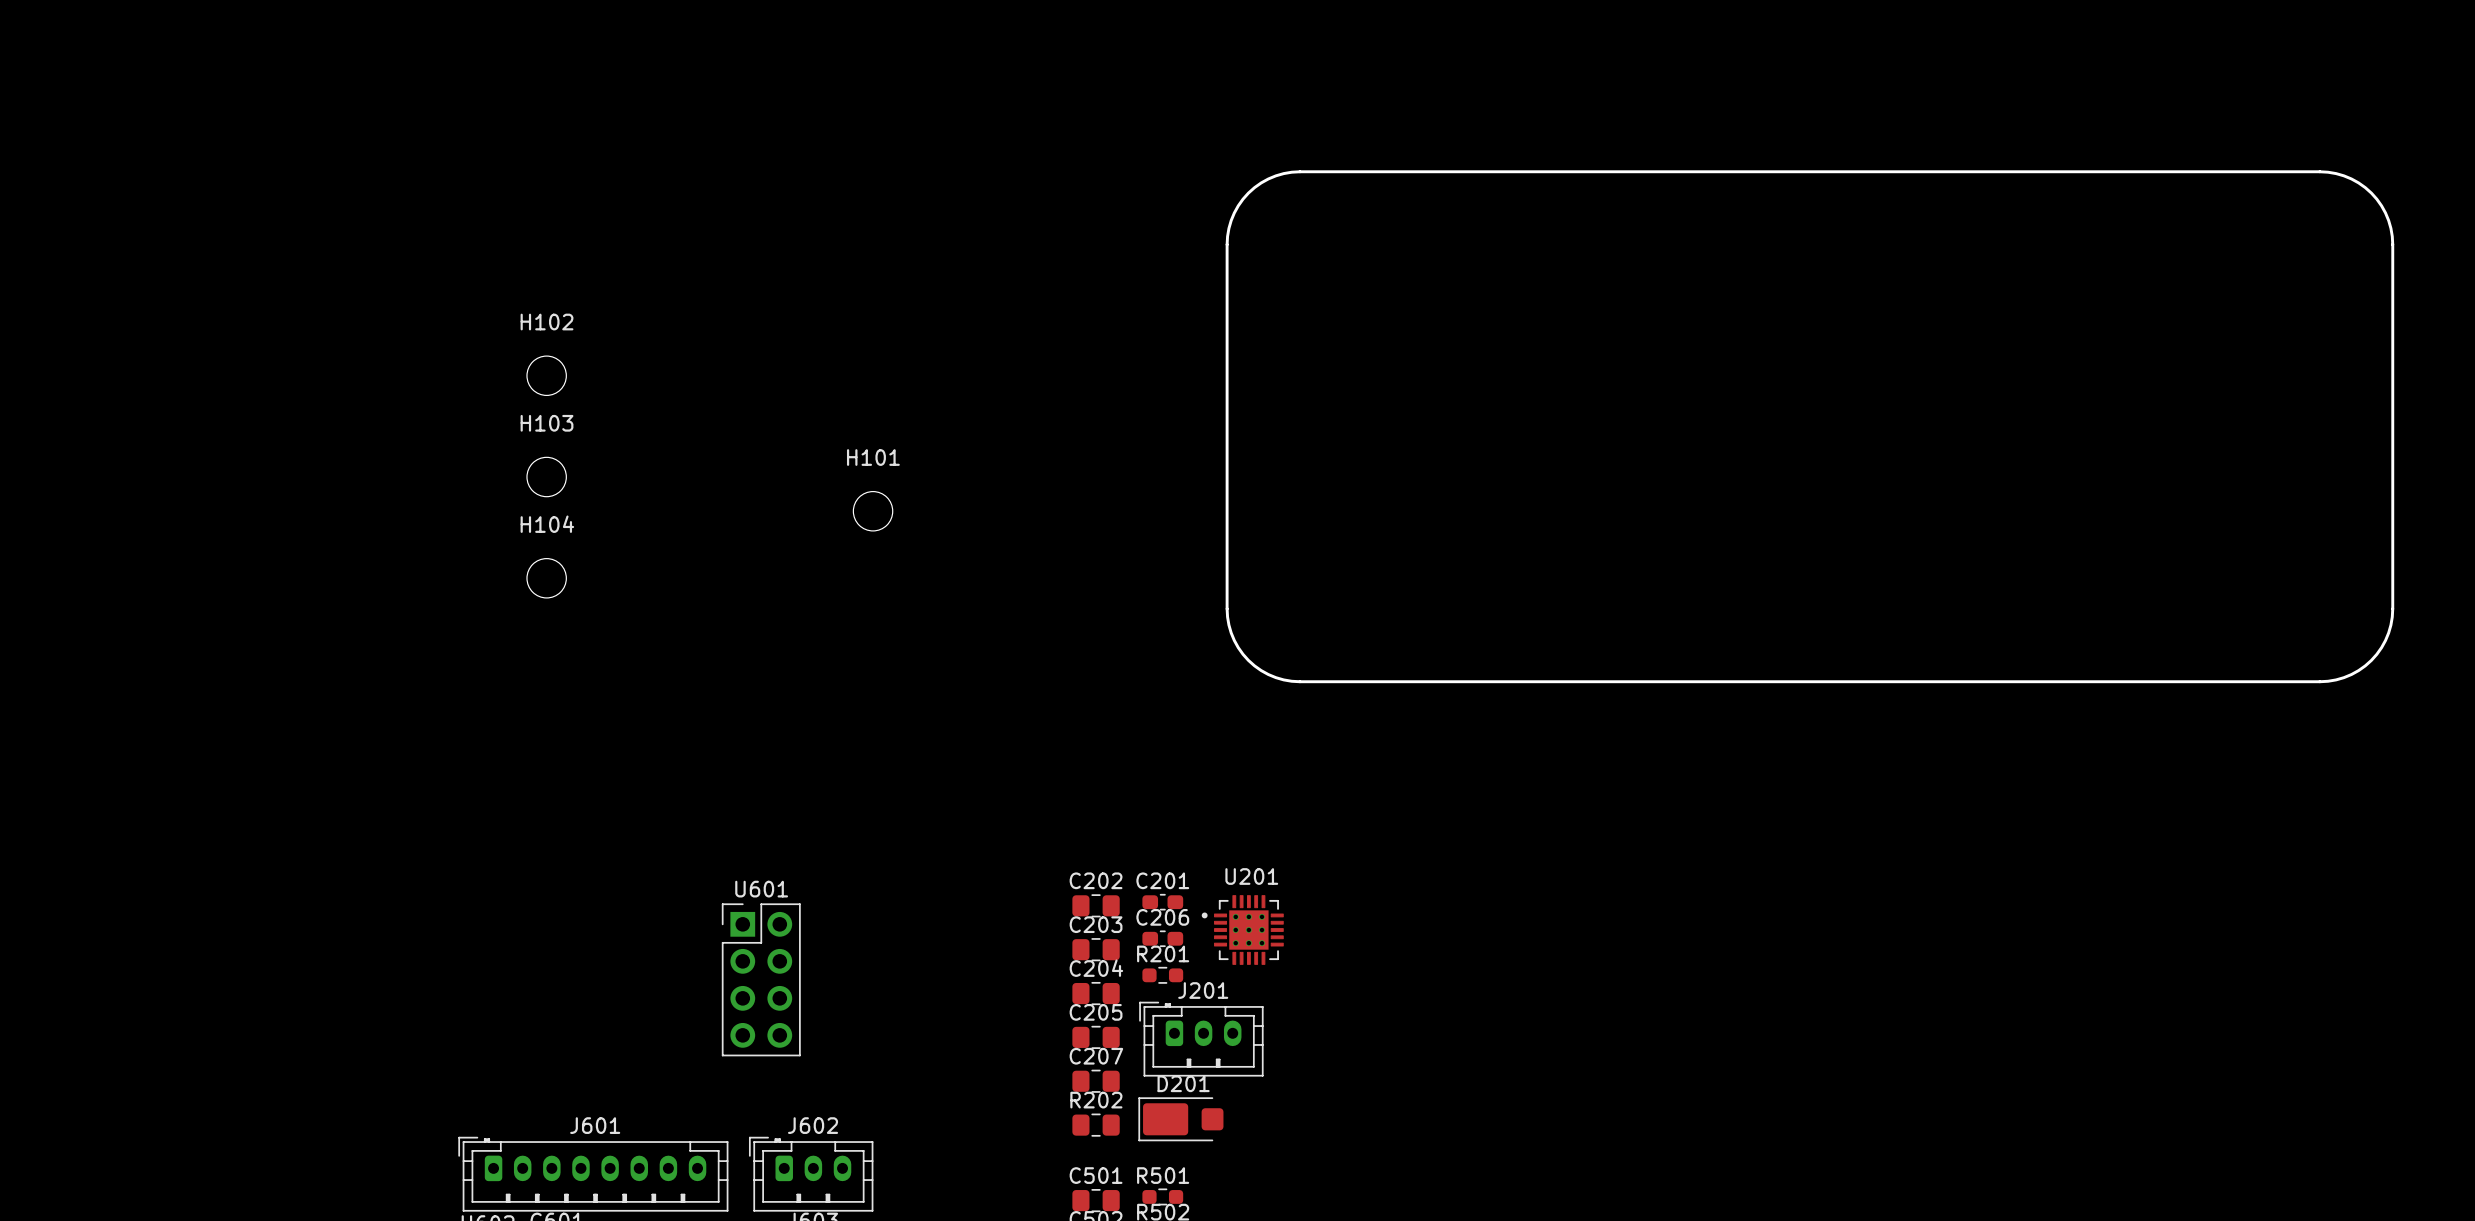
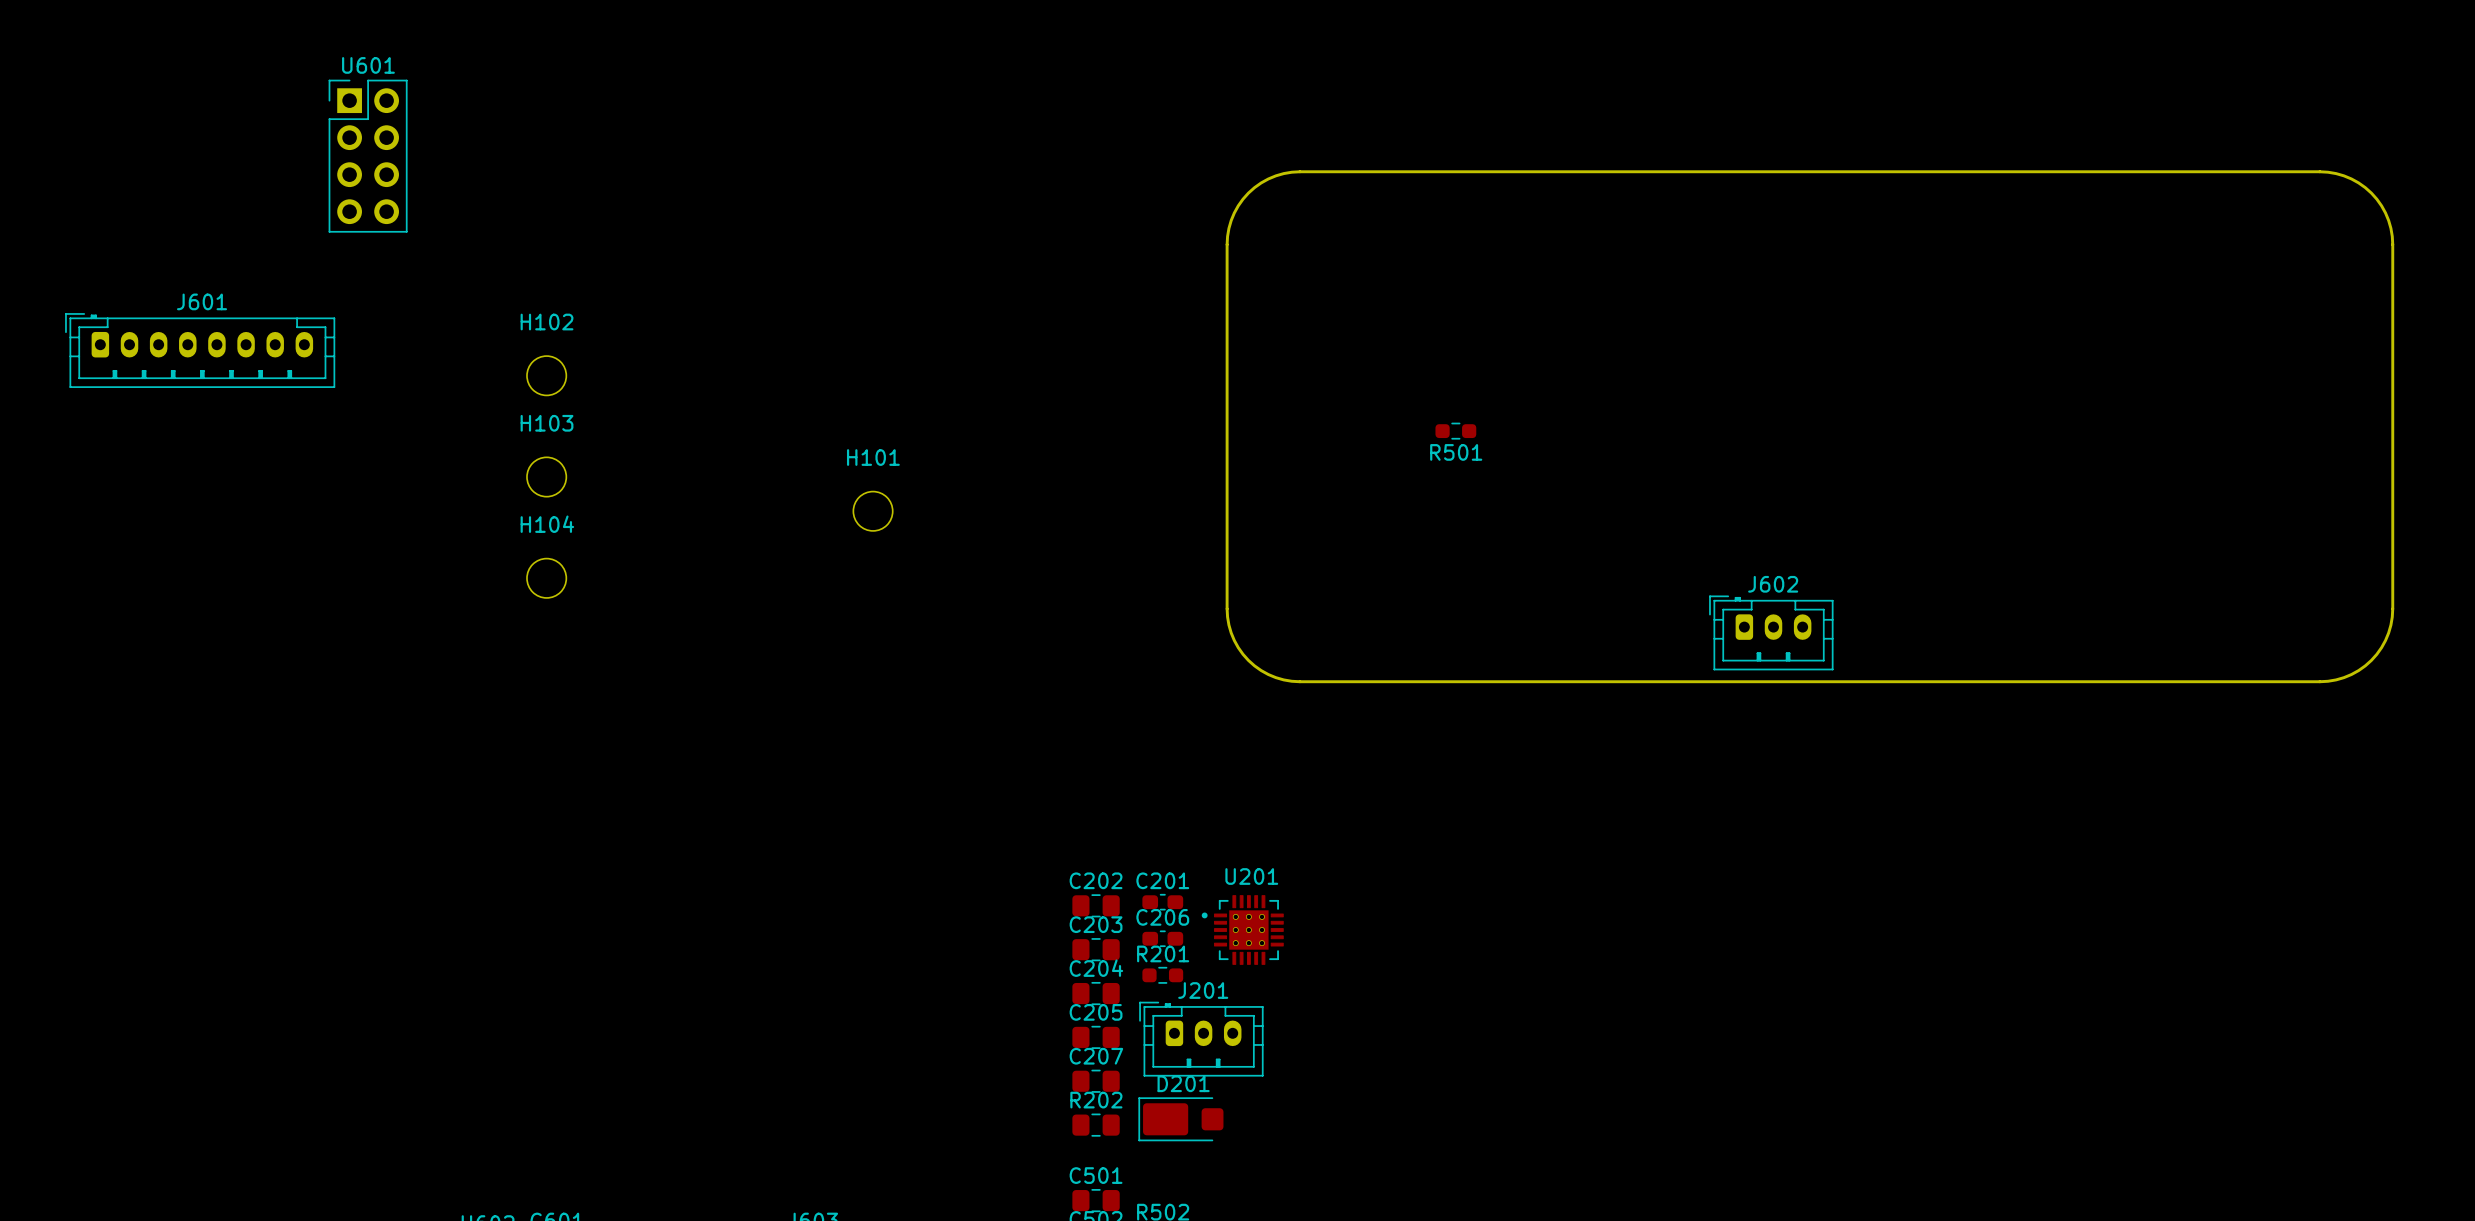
U601 position: (761, 979) -> (368, 156)
J601 position: (593, 1174) -> (200, 350)
J602 position: (811, 1174) -> (1771, 632)
R501 name position: R501 (1163, 1175) -> R501 (1456, 452)
R501 position: (1162, 1196) -> (1455, 431)

